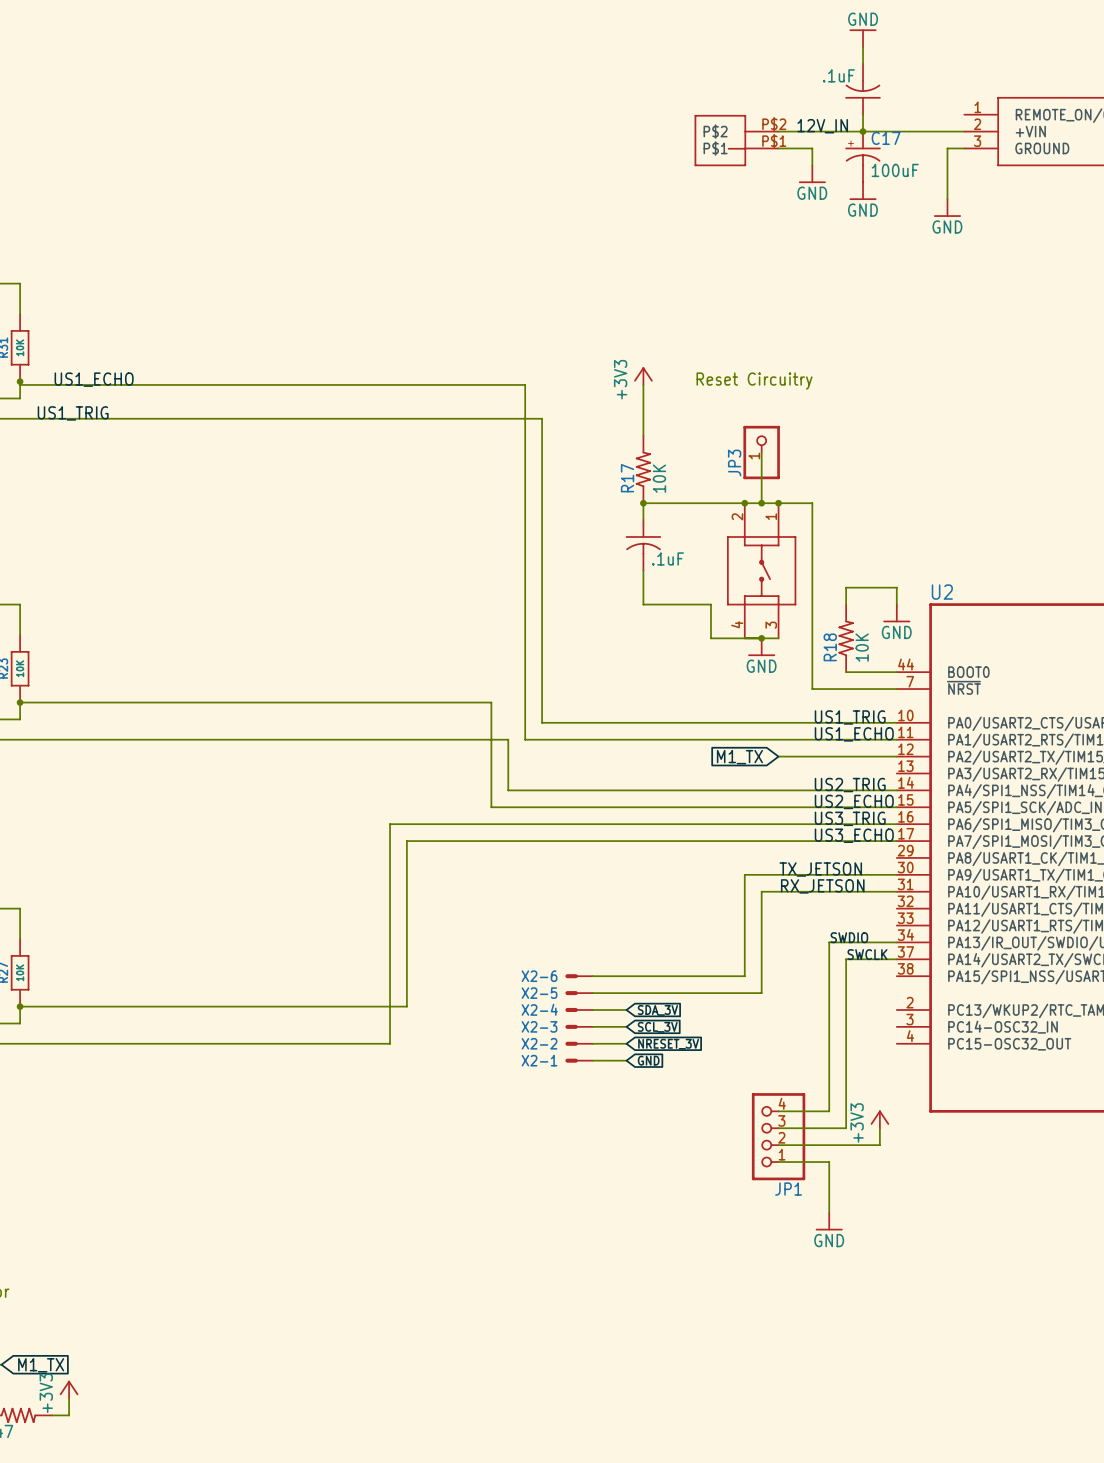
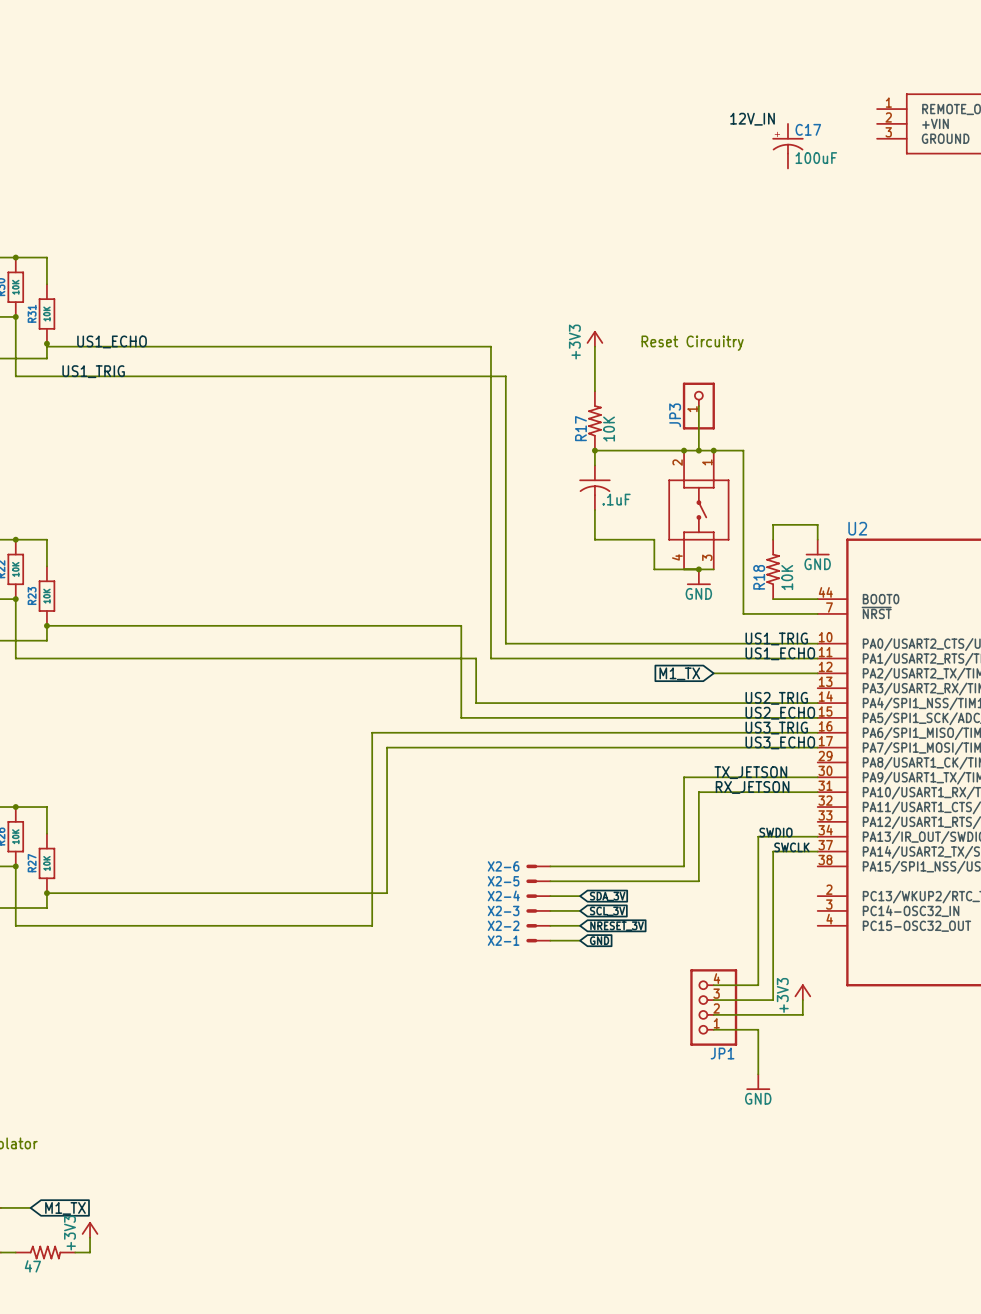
power symbol: GND (863, 38) -> none
wire: (863, 47) (863, 64) -> none
part: .1uF (863, 89) -> none
wire: (863, 114) (863, 131) -> none
wire: (778, 131) (964, 131) -> none
junction: (863, 131) -> none
part: (736, 140) -> none
wire: (778, 148) (812, 148) (812, 165) -> none
wire: (964, 148) (947, 148) (947, 199) -> none
power symbol: GND (812, 174) -> none
power symbol: GND (863, 191) -> none
power symbol: GND (947, 208) -> none

